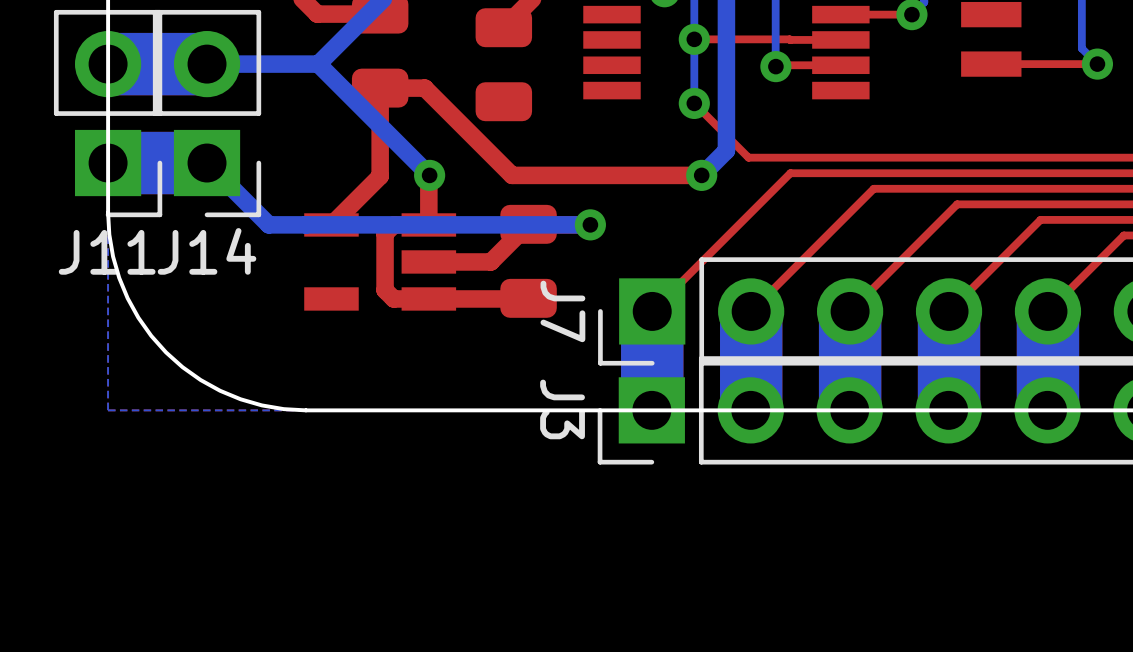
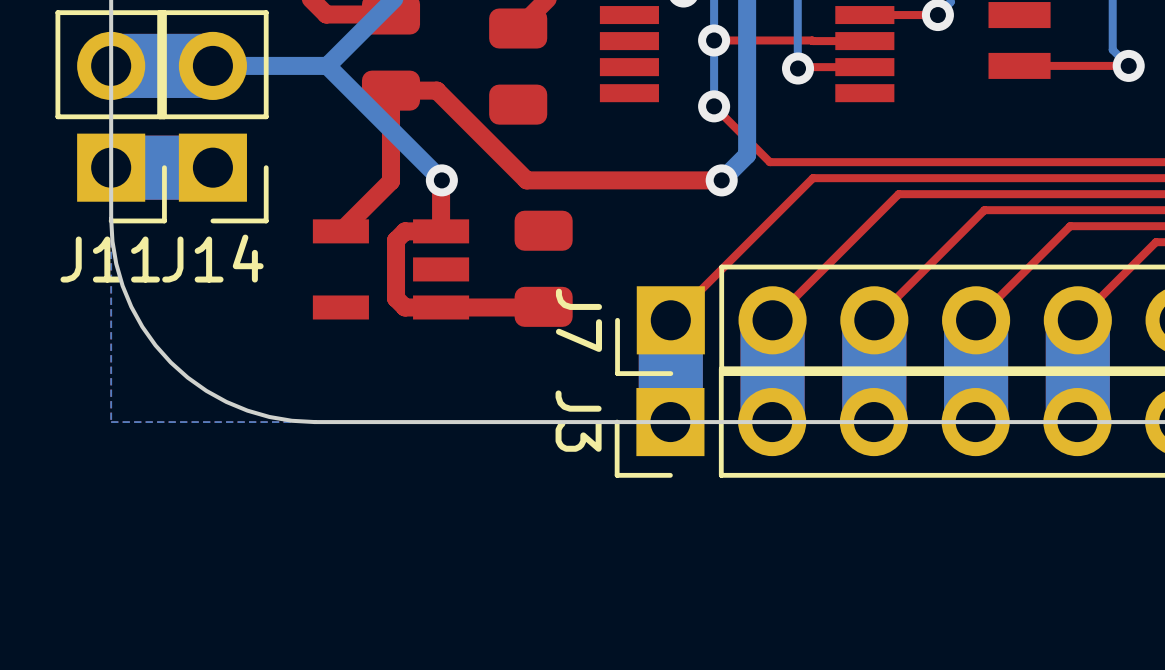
bottom track: (207, 163) (268, 224) (590, 224) -> none
top track: (528, 224) (490, 261) (428, 261) -> none
via: (590, 224) -> none

